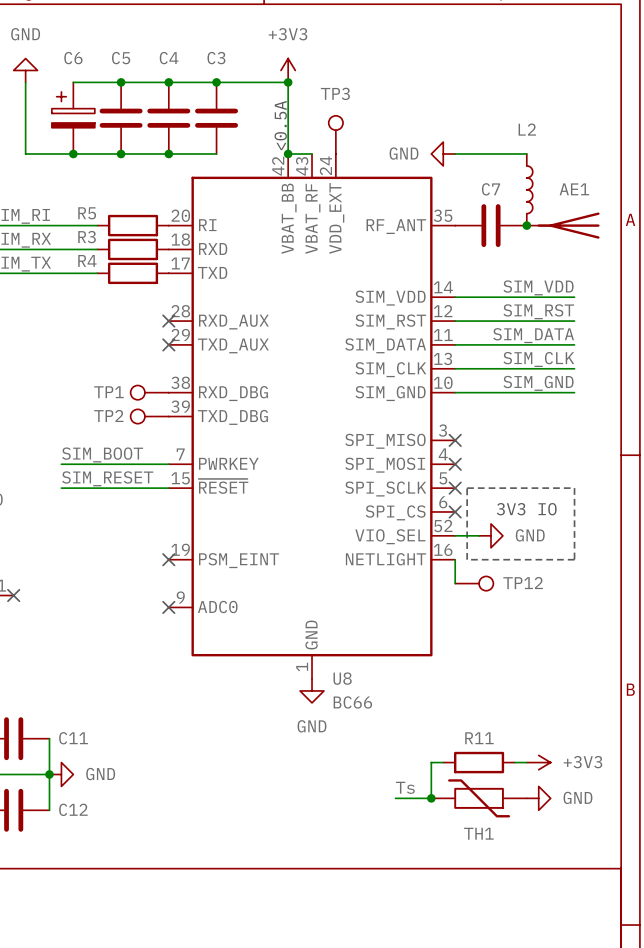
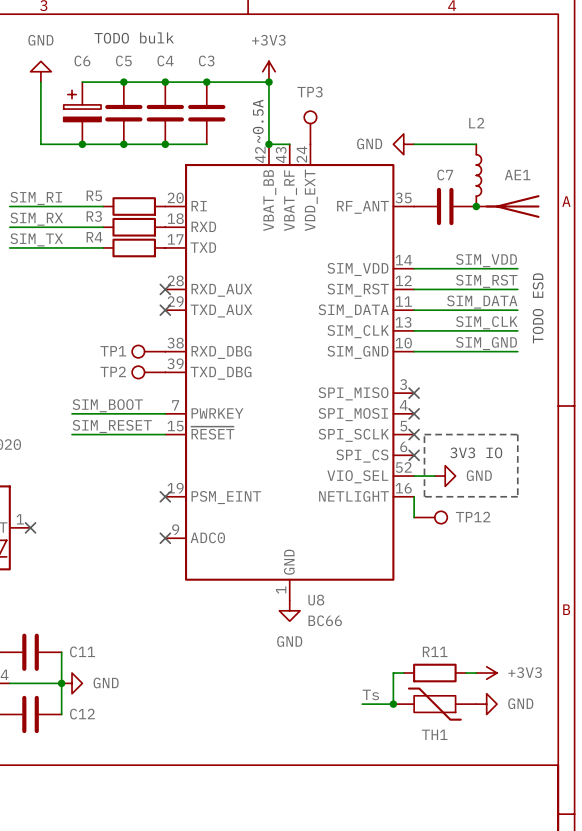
text: none -> TODO bulk (134, 37)
text: <0.5A (280, 125) -> ~0.5A (258, 121)
text: none -> TODO ESD (538, 308)

